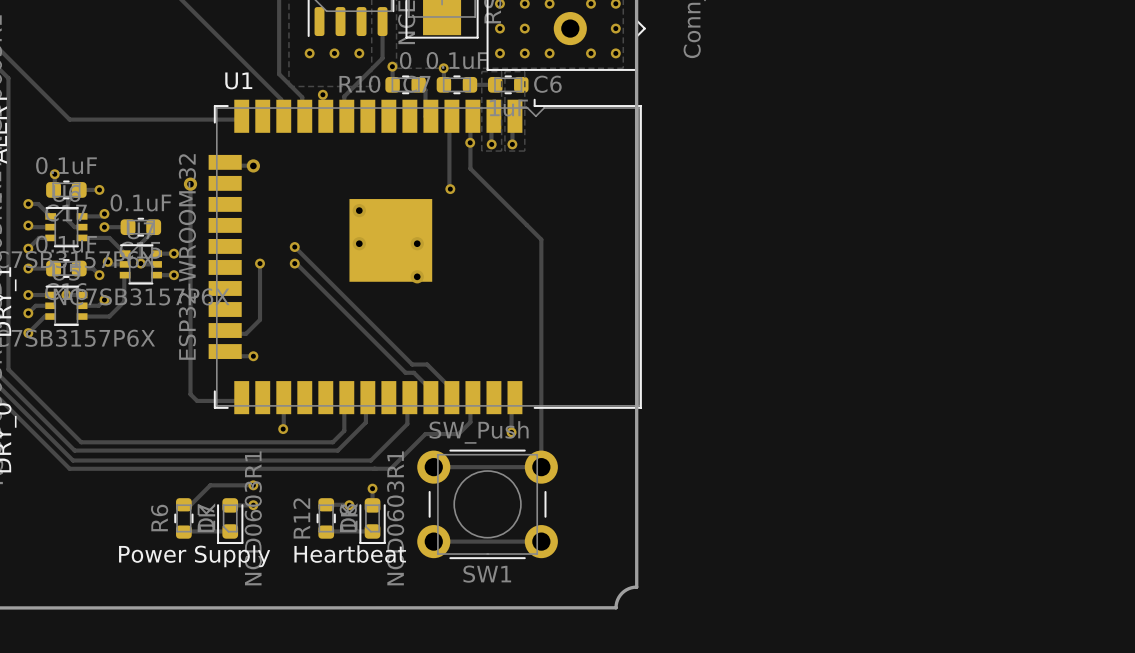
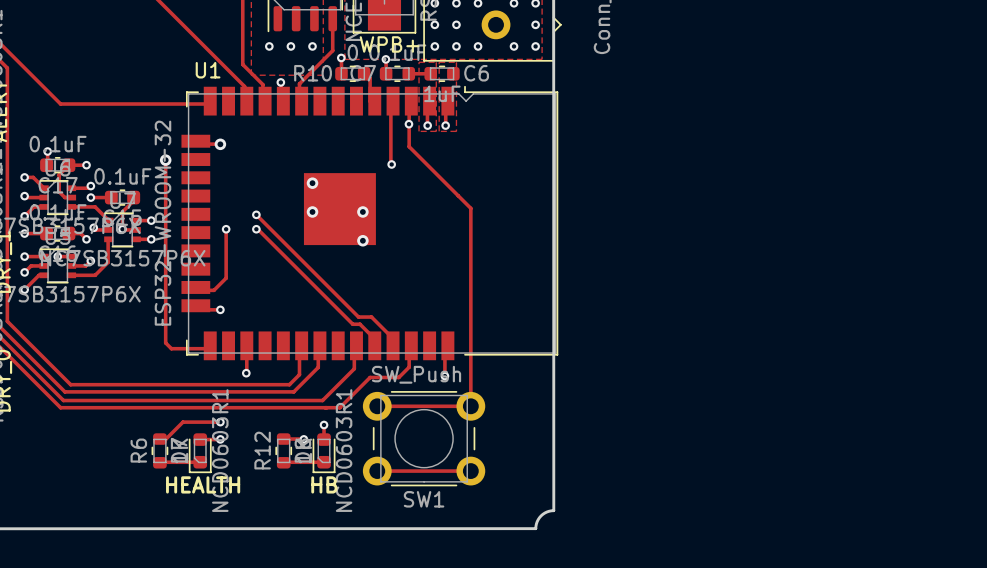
text: none -> WPB+ (389, 44)
text: Heartbeat (350, 554) -> none
text: Power Supply (194, 556) -> none
text: none -> HEALTH (203, 484)
text: none -> HB (324, 484)

